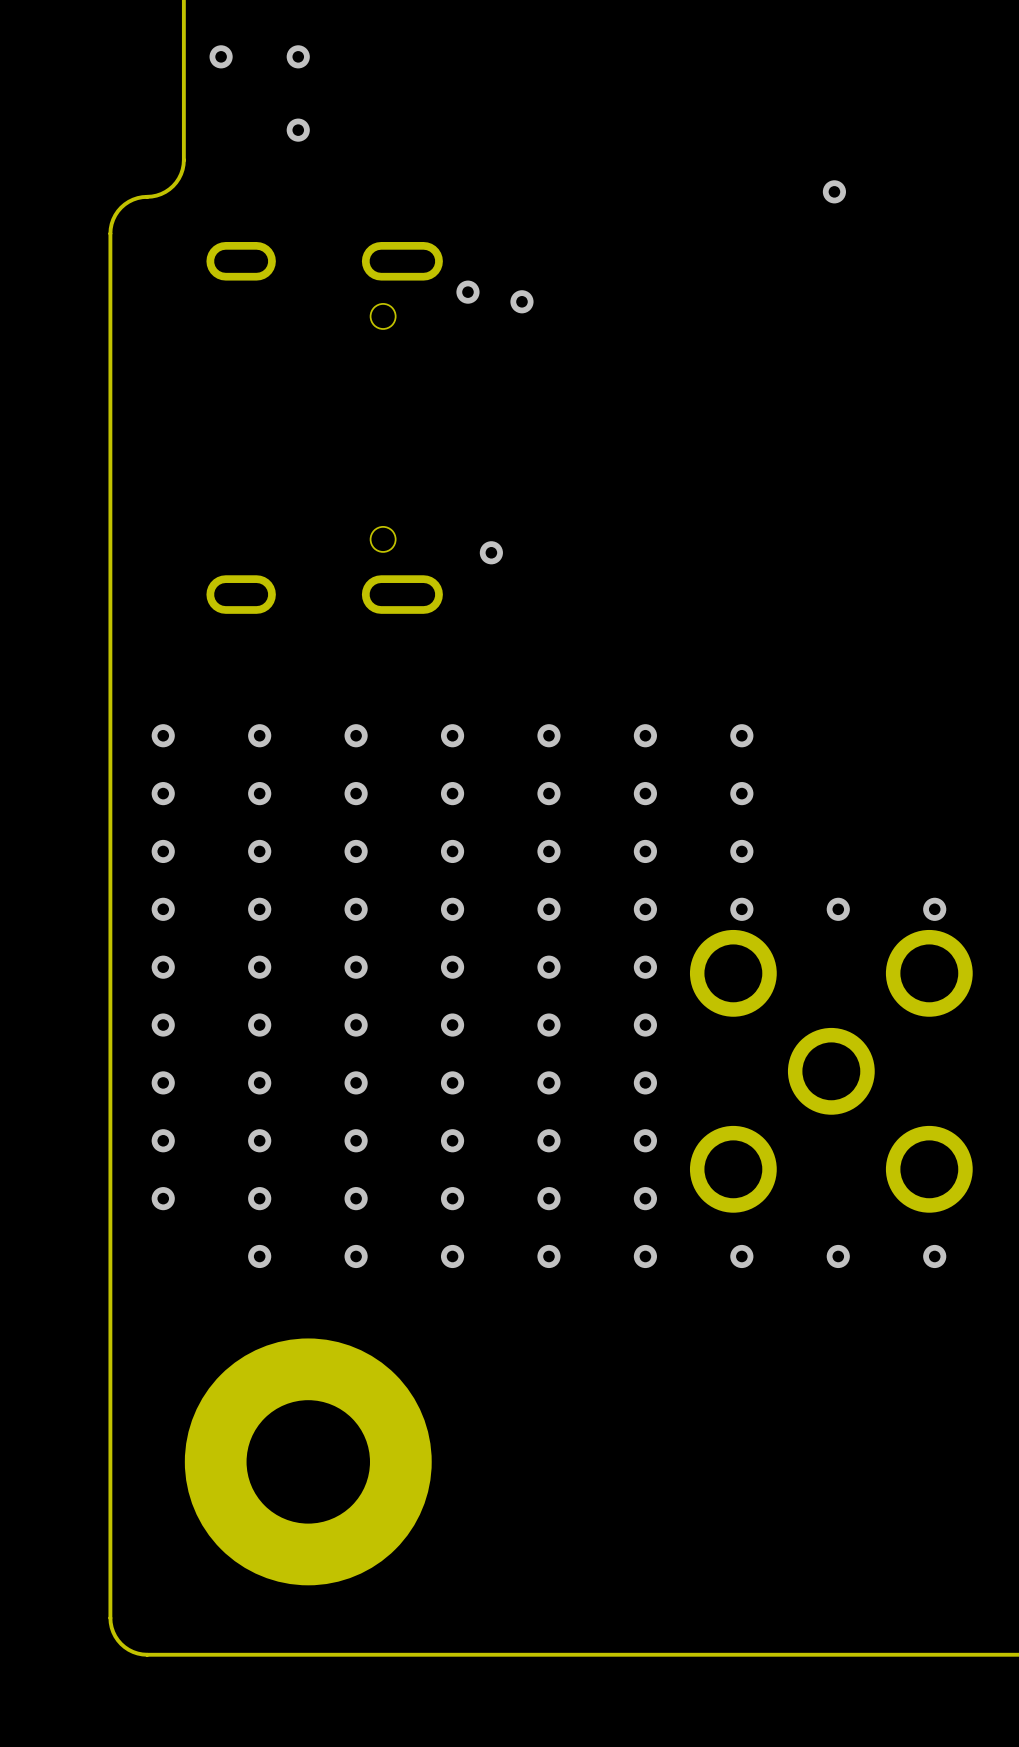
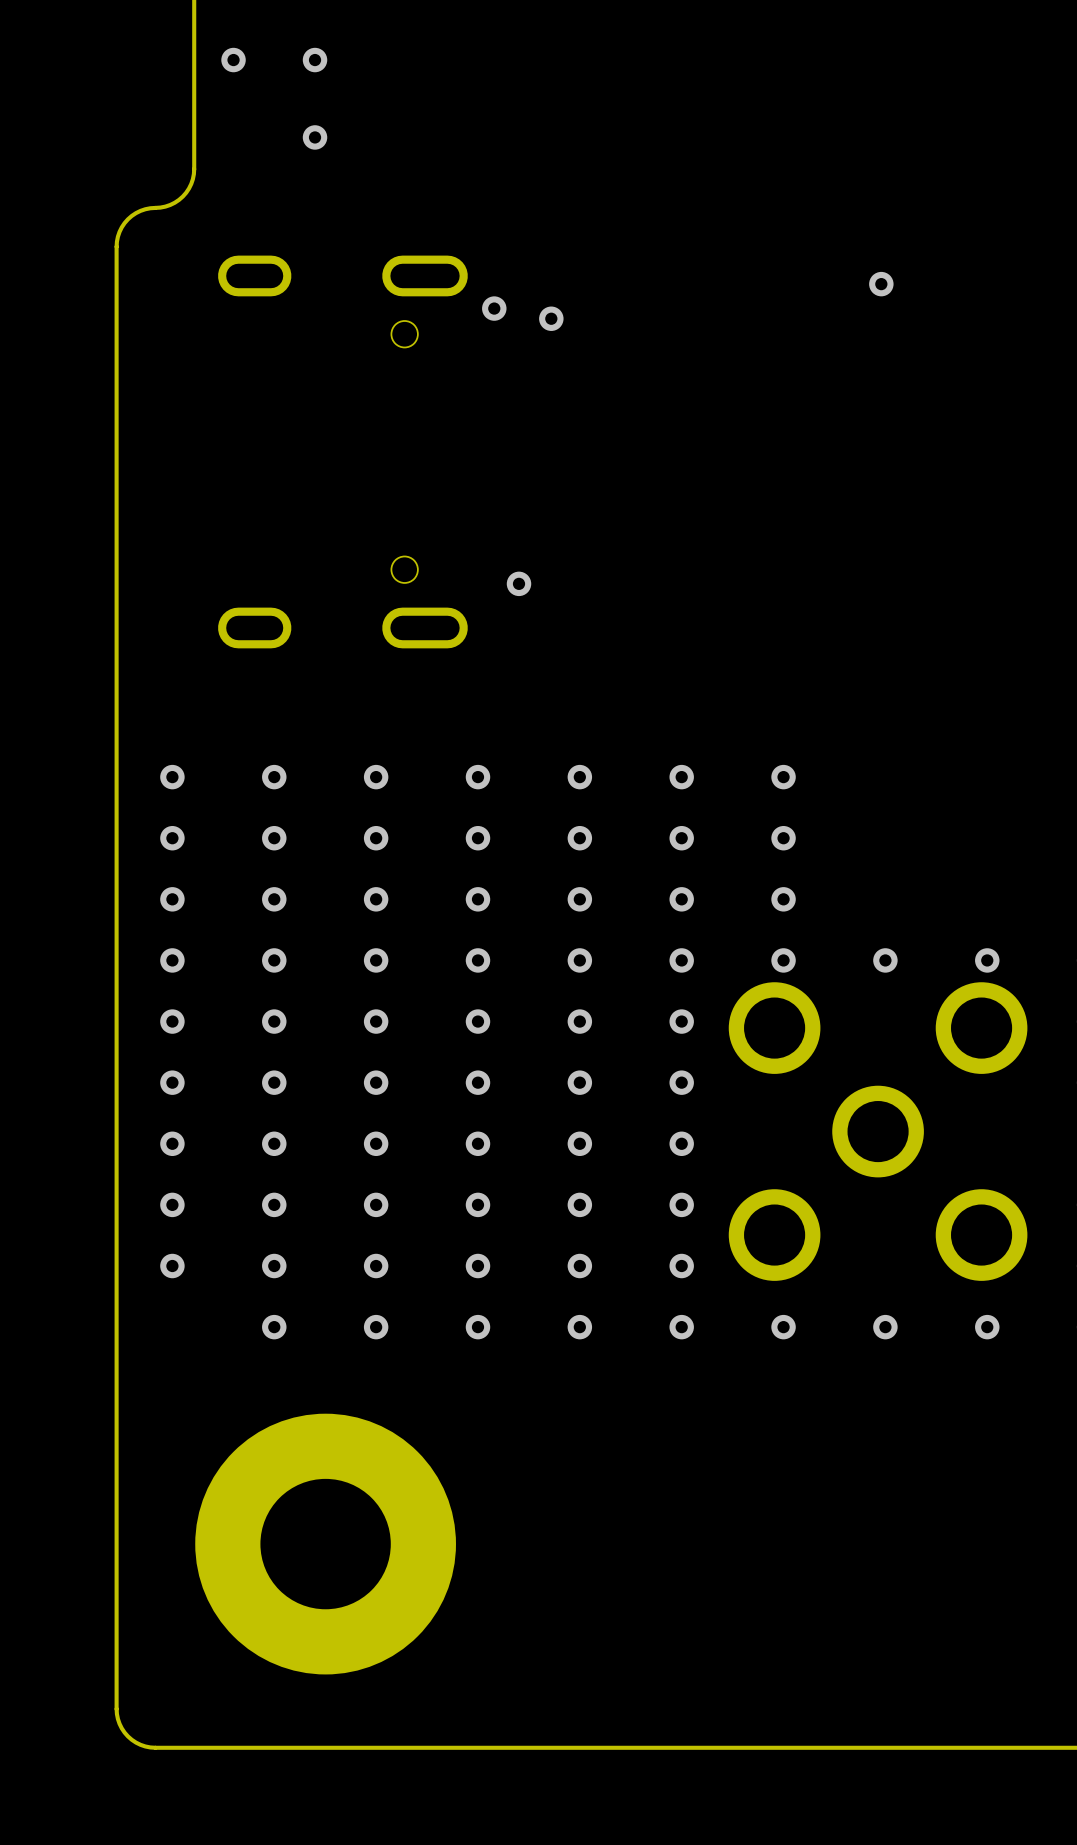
via position: (834, 191) -> (881, 284)

